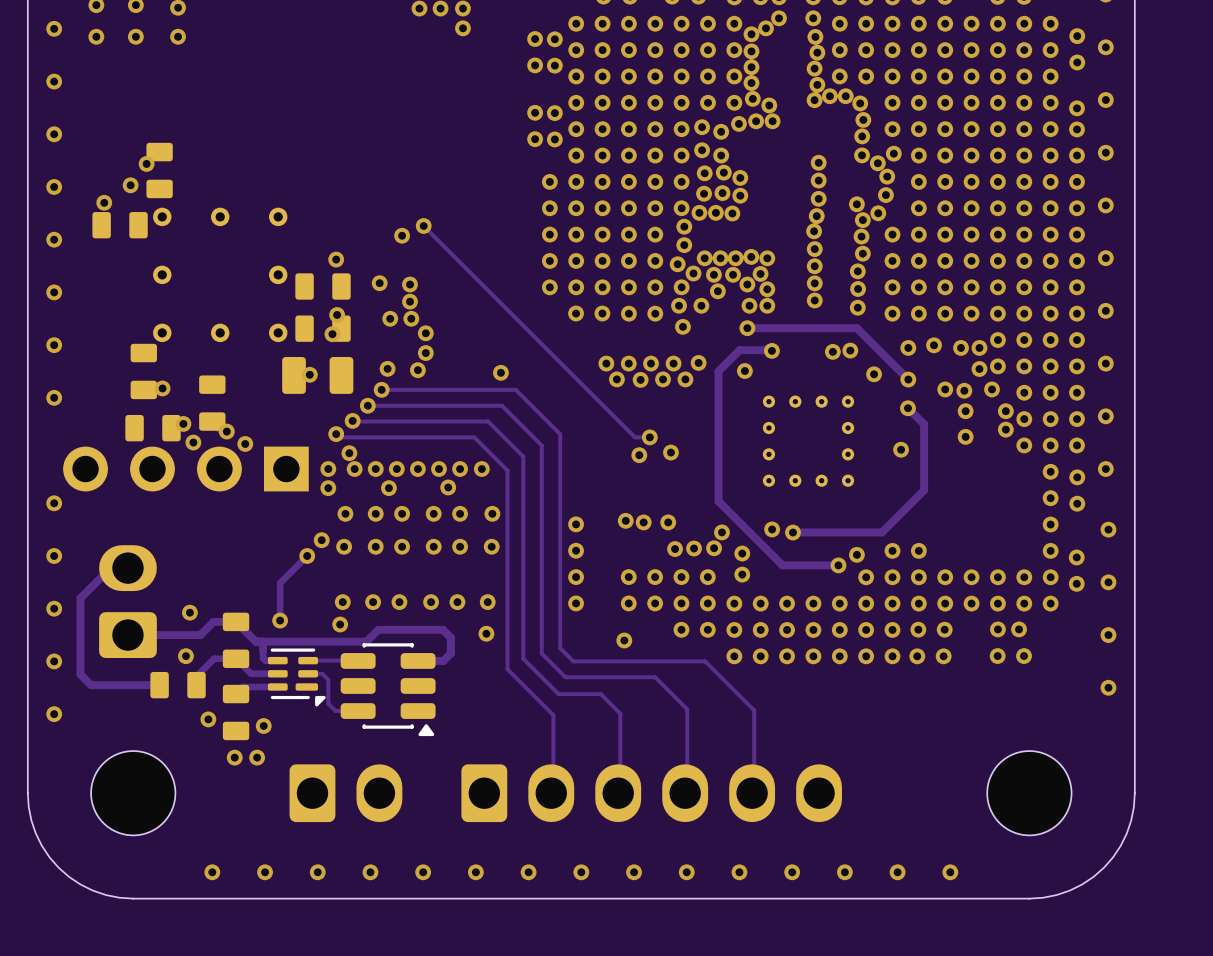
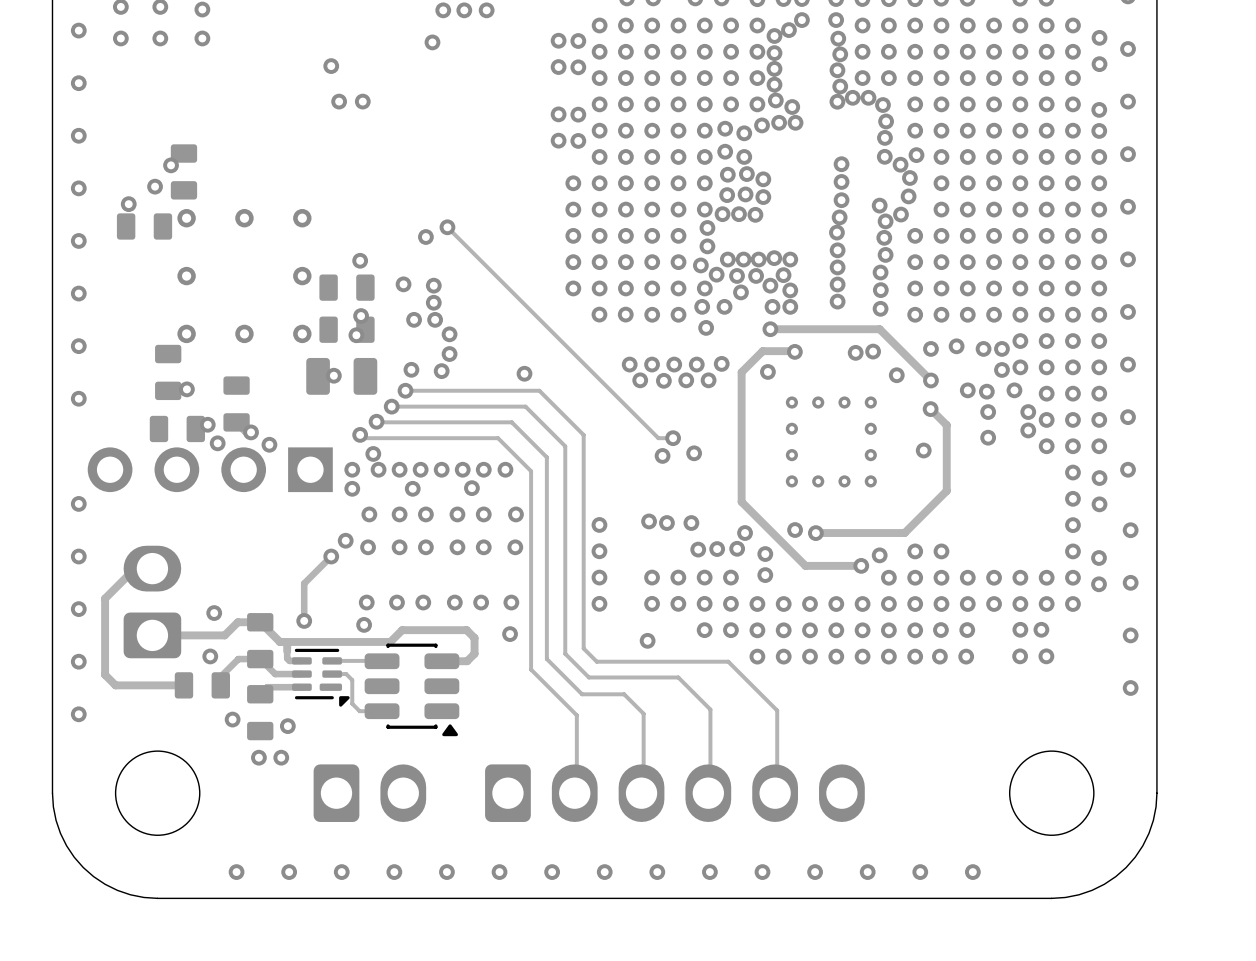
via: (462, 28) -> none
via: none -> (432, 42)
via: none -> (331, 66)
via: none -> (339, 101)
via: none -> (362, 101)

